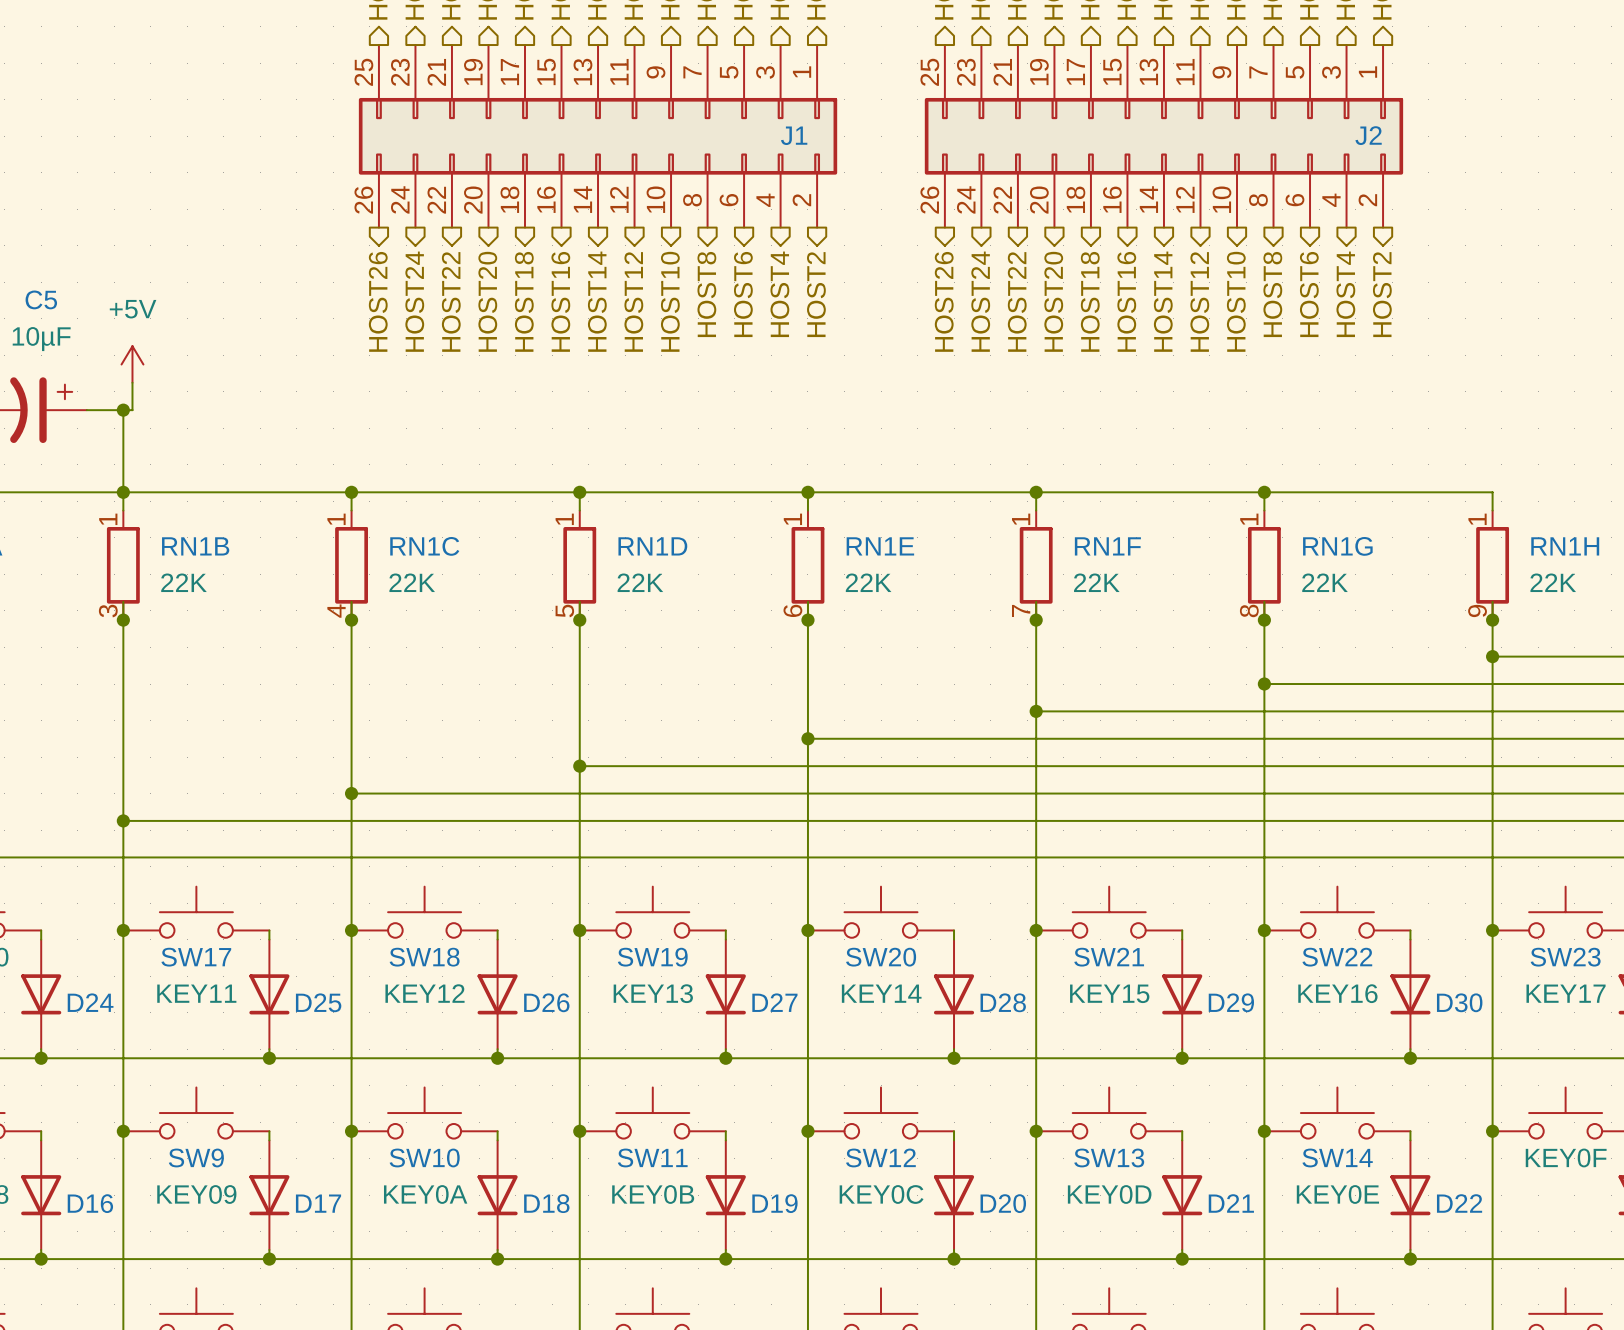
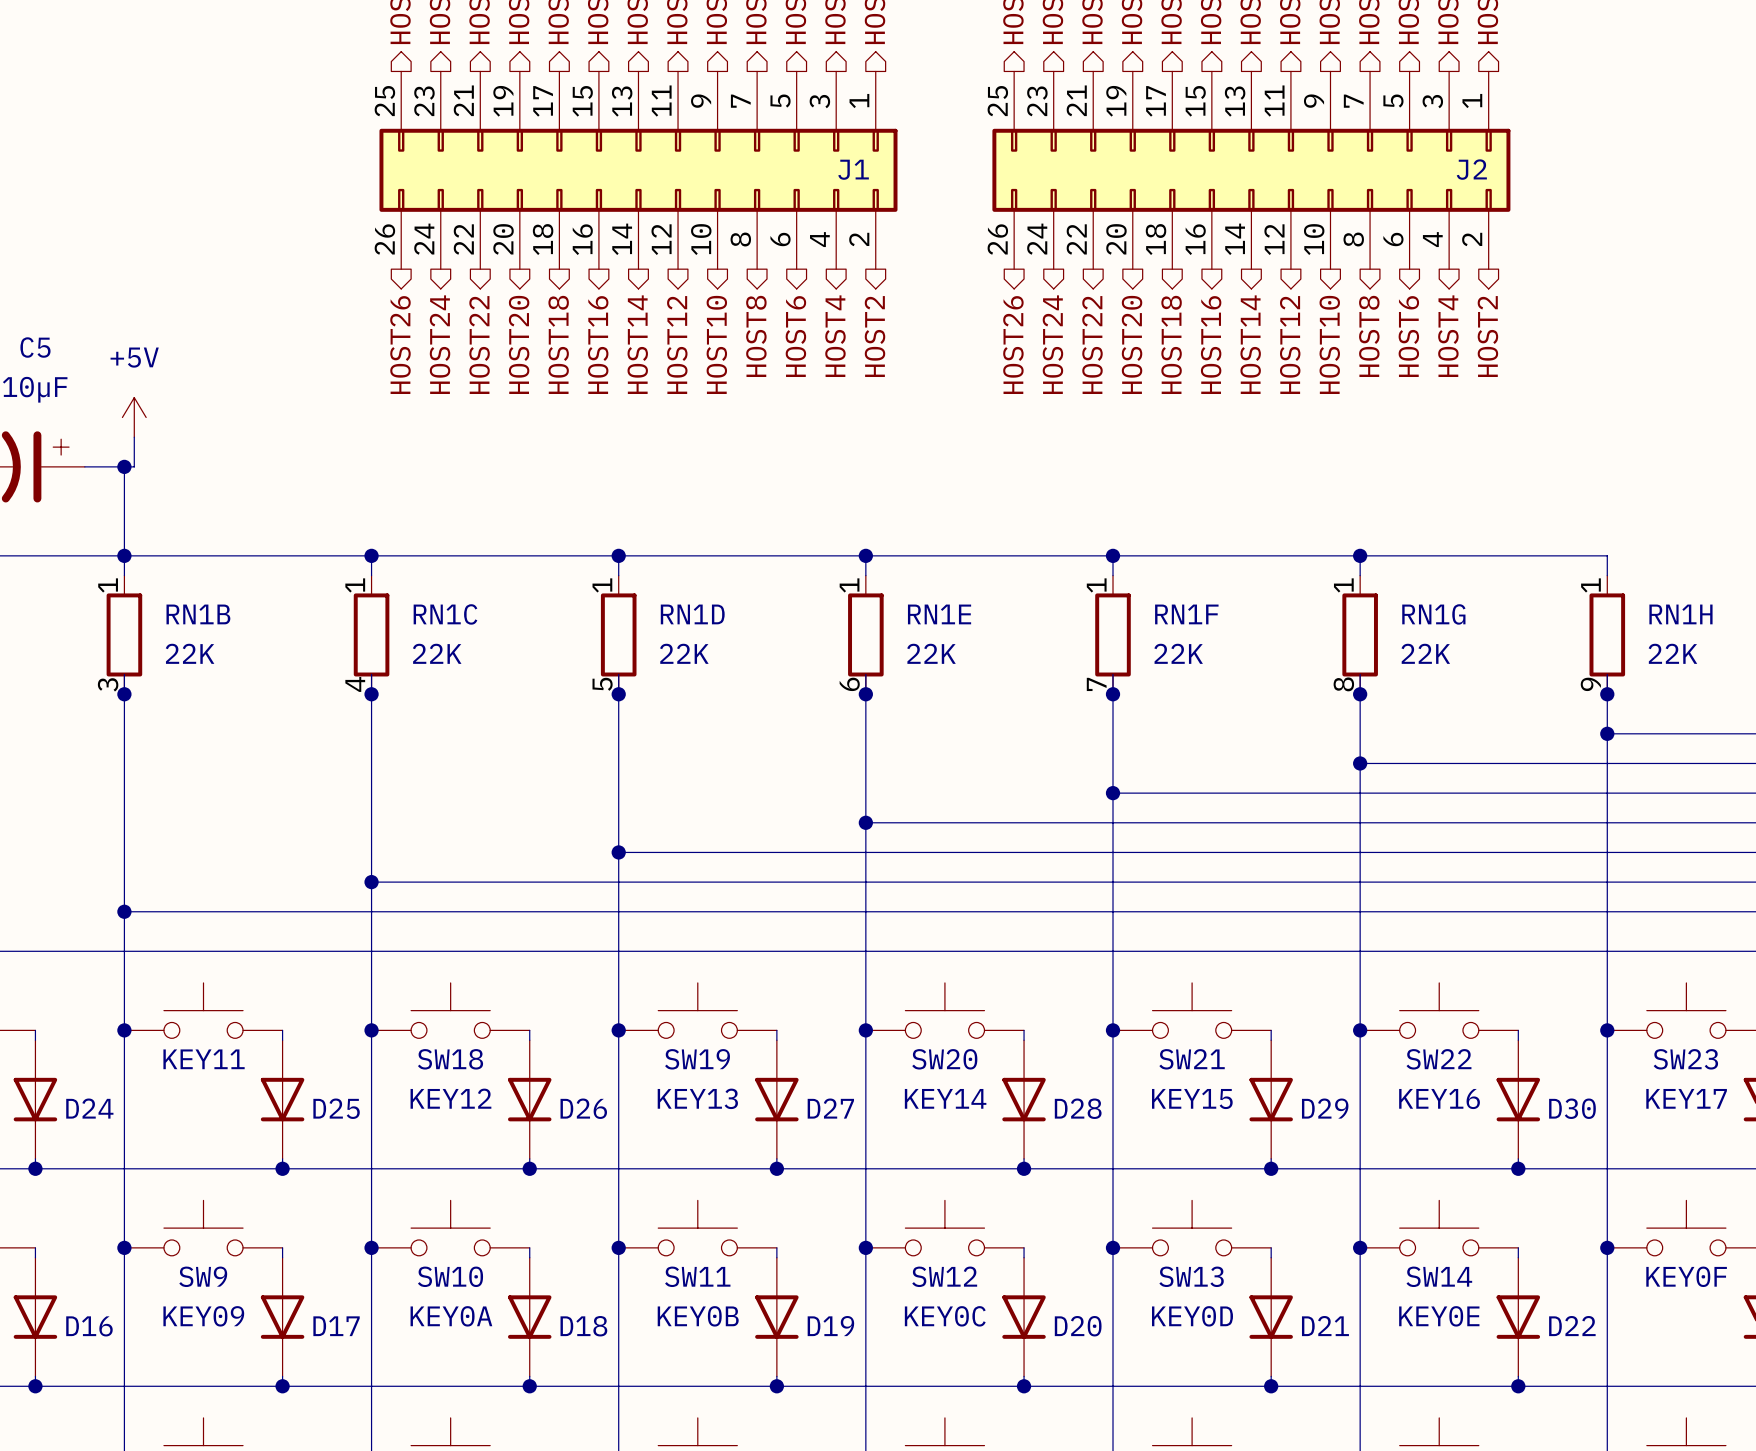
SW17 name: SW17 (196, 957) -> none
SW17 value position: KEY11 (196, 993) -> KEY11 (204, 1059)

